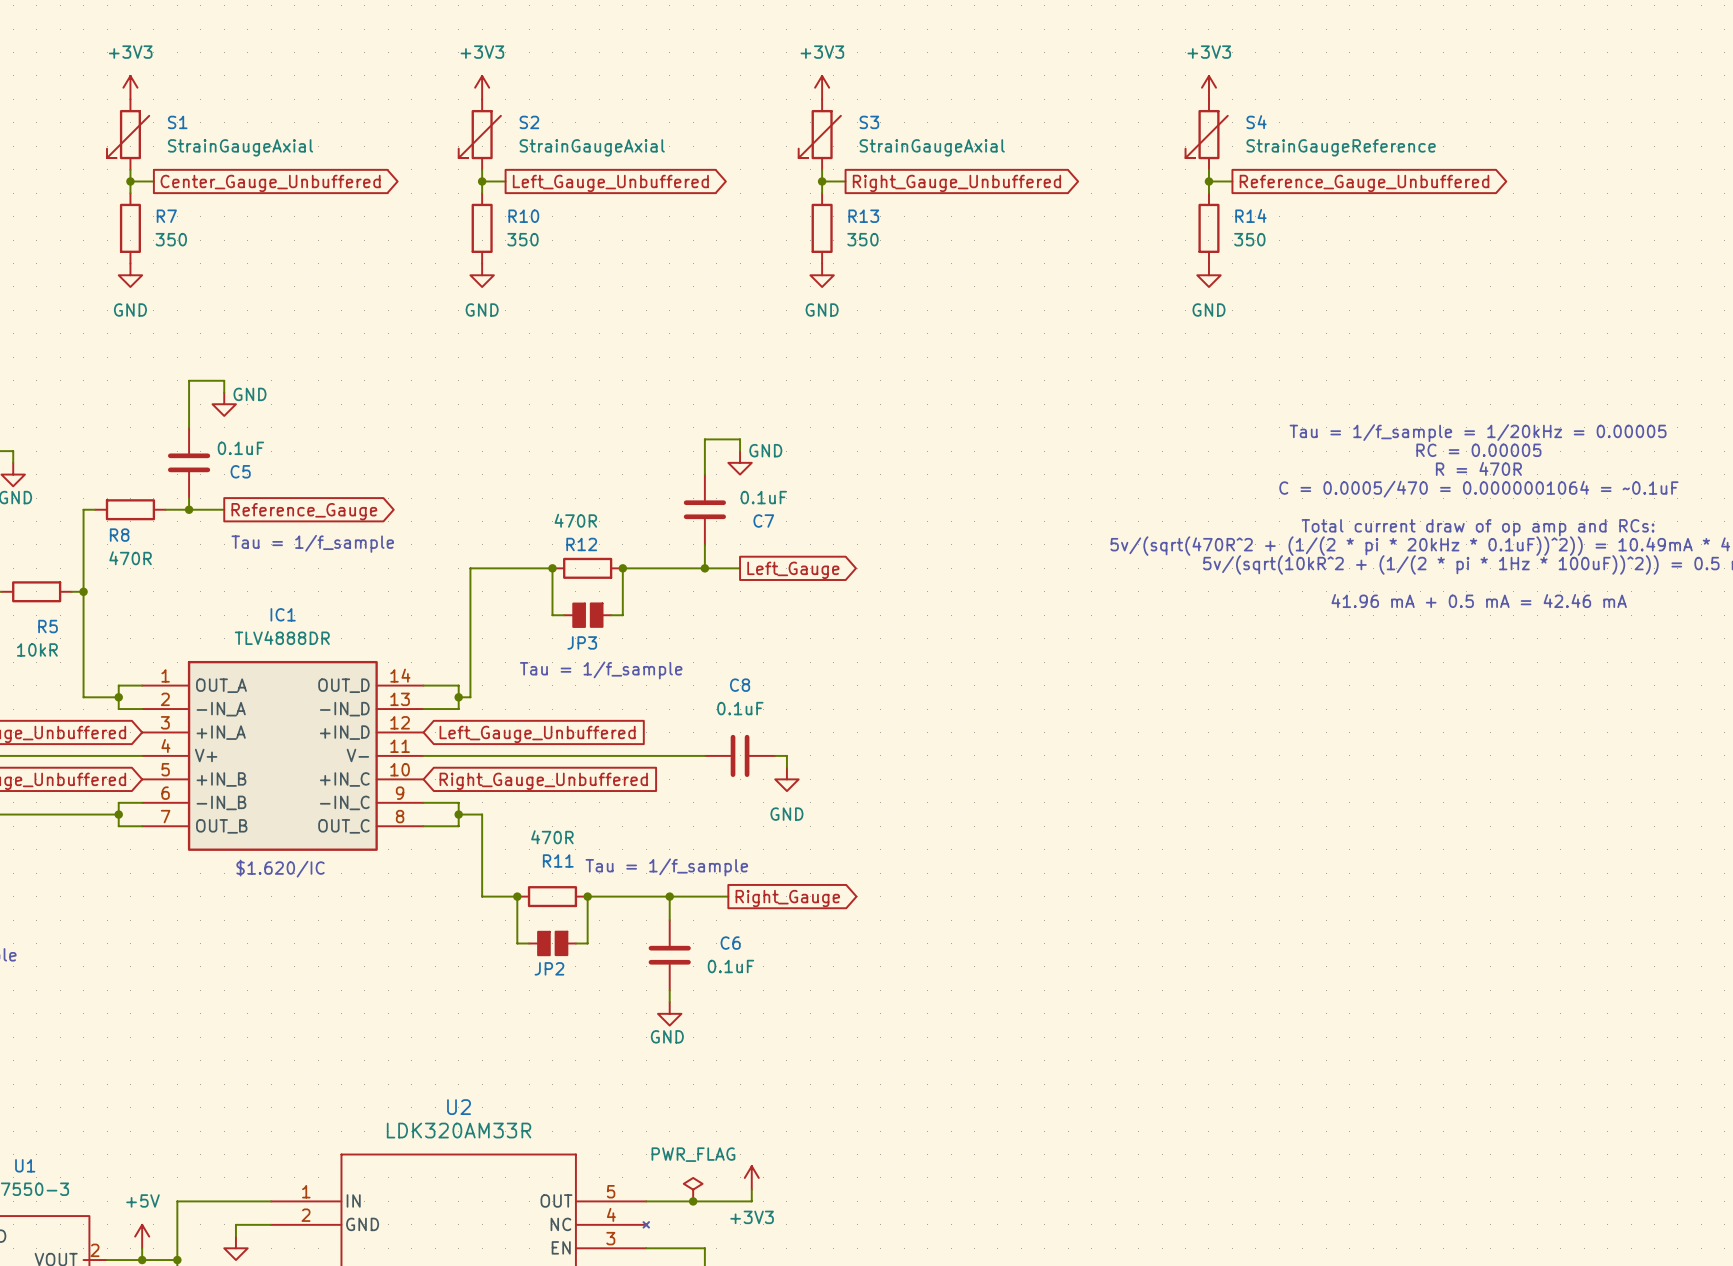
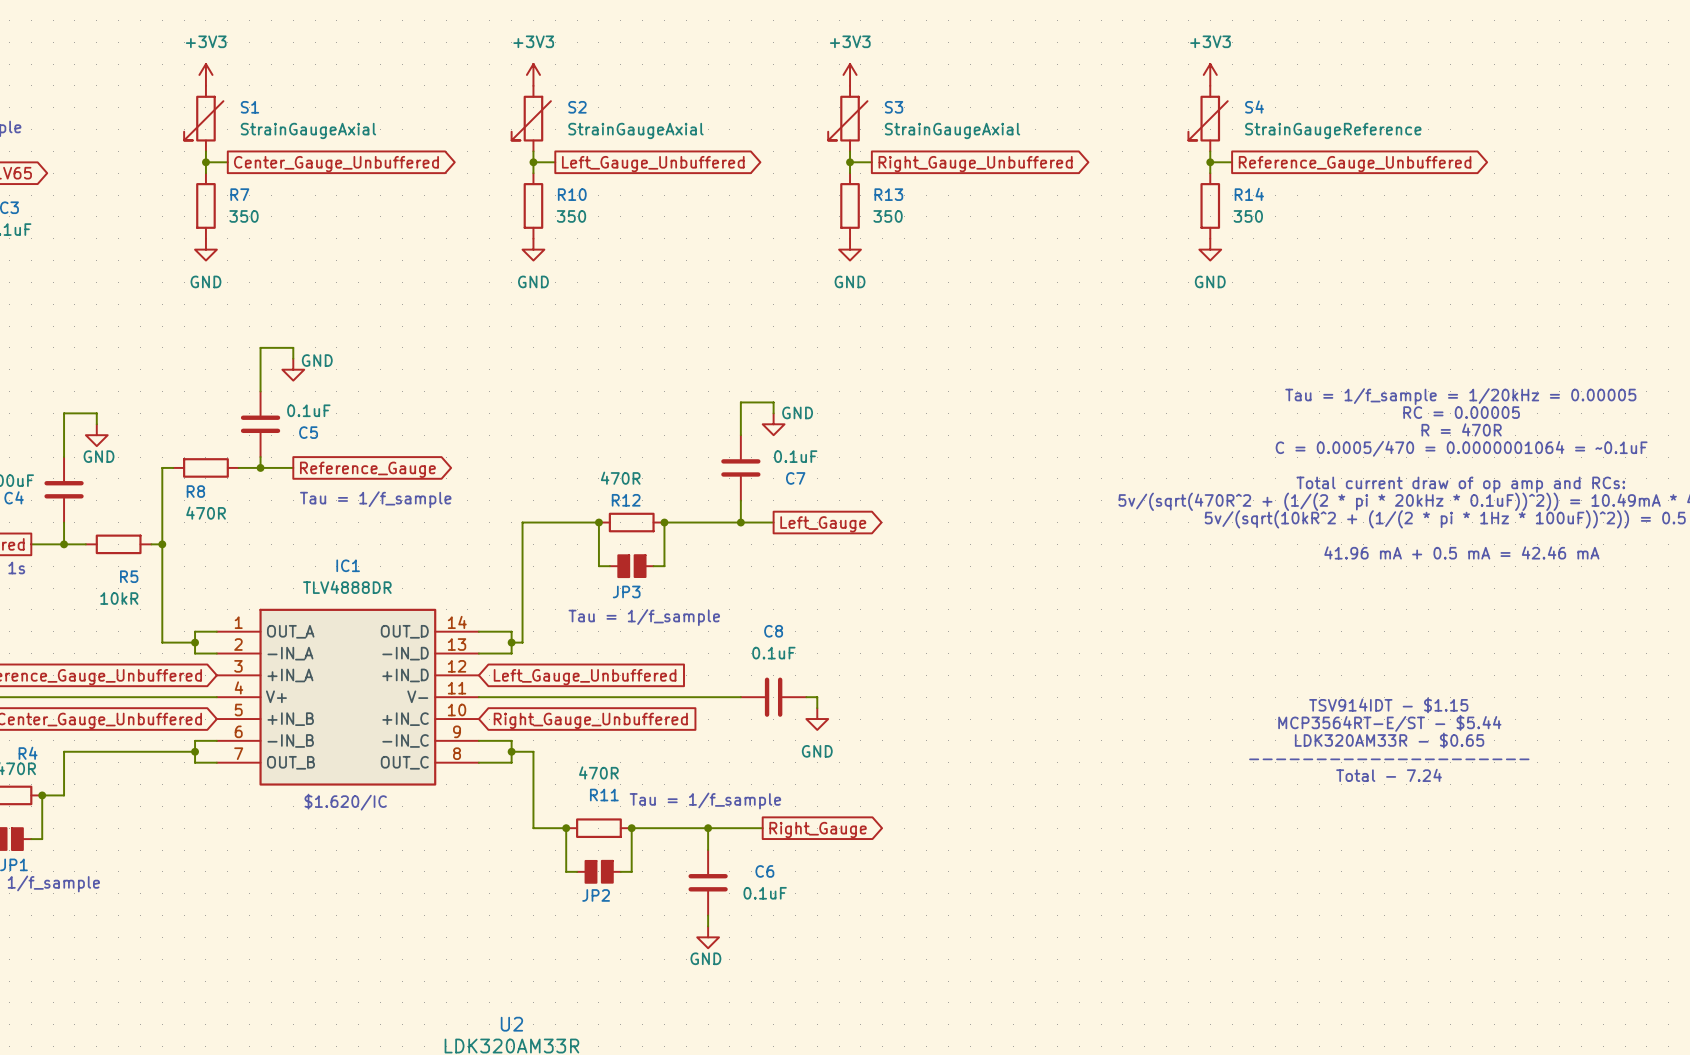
text: none -> TSV914IDT - $1.15 (1388, 705)
text: none -> MCP3564RT-E/ST - $5.44 (1389, 723)
text: none -> LDK320AM33R - $0.65 (1389, 740)
text: none -> --------------------- (1389, 759)
text: none -> Total - 7.24 (1389, 775)

